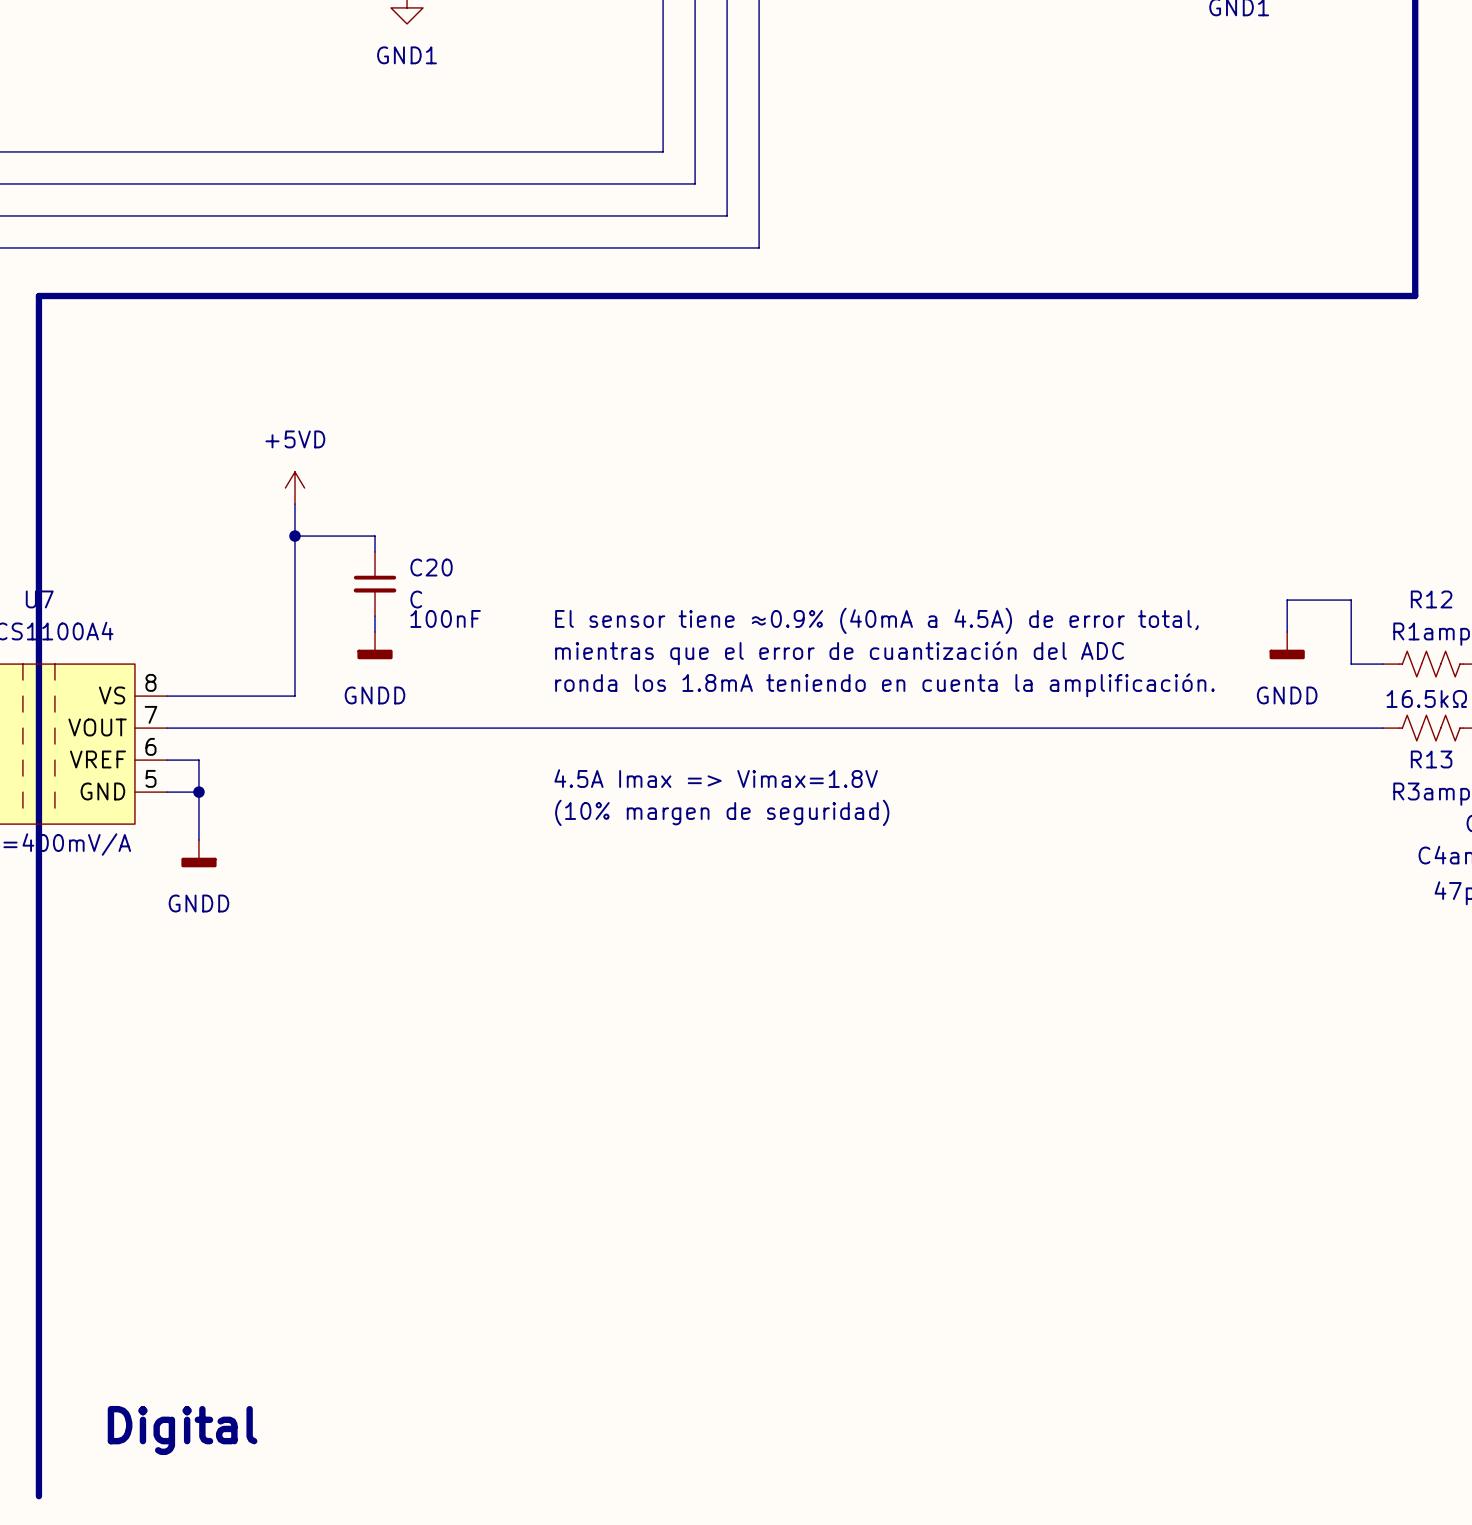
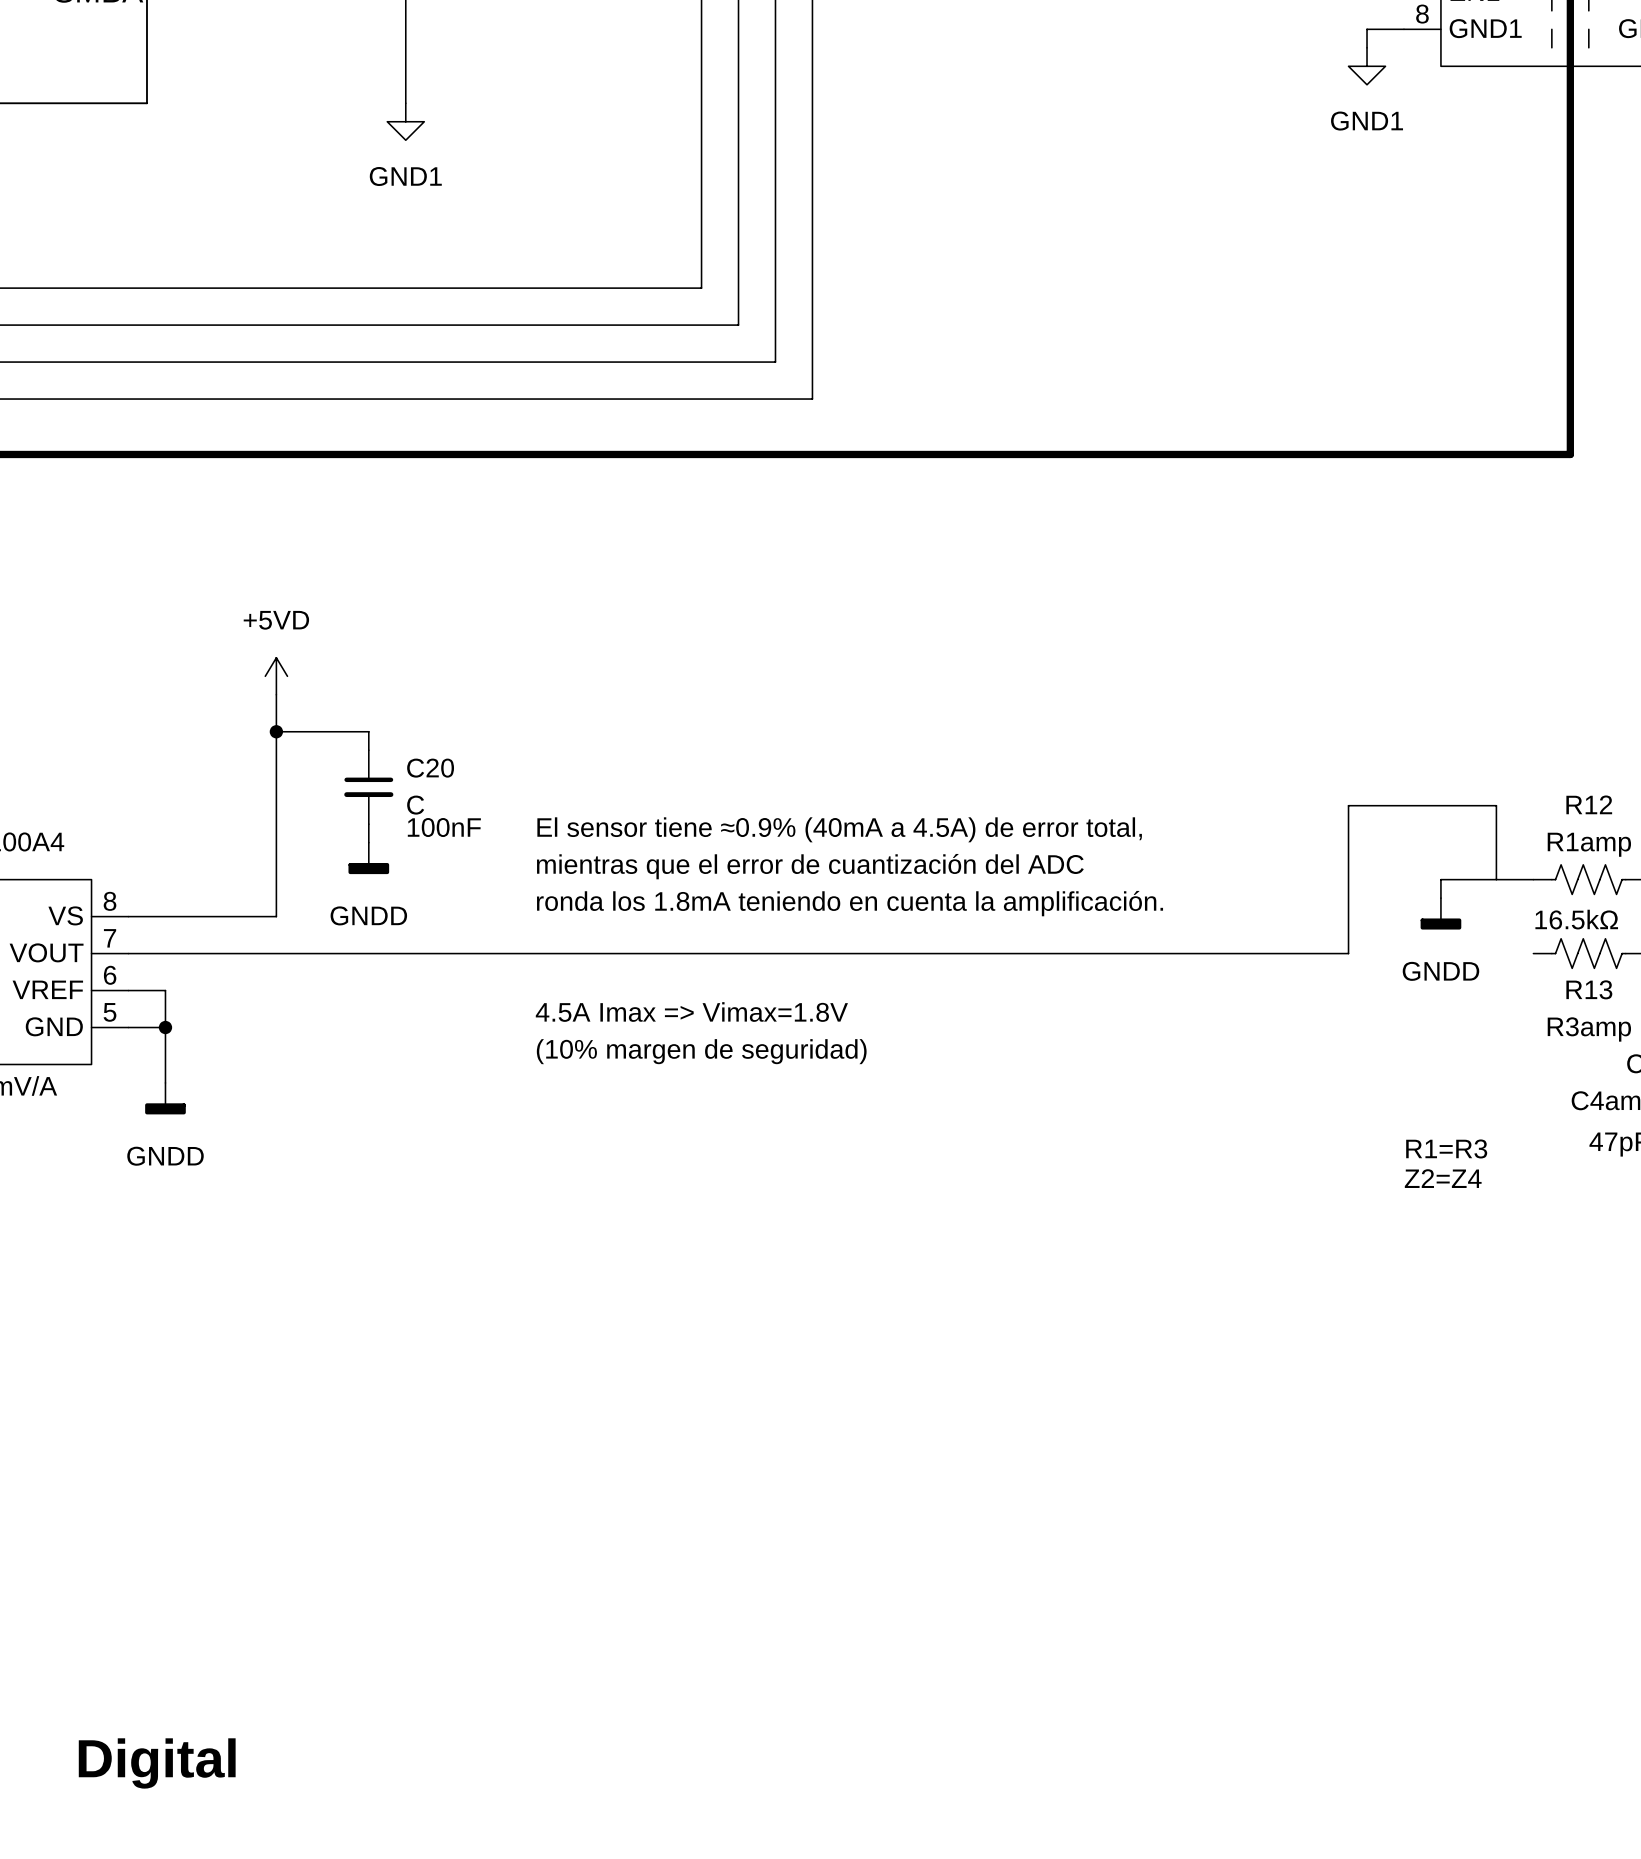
wire: (1287, 600) (1287, 632) -> (1422, 805) (1348, 805) (1348, 953)
text position: El sensor tiene ≈0.9% (40mA a 4.5A) de error total, (876, 620) -> El sensor tiene ≈0.9% (40mA a 4.5A) de error total, (839, 829)
power symbol position: GNDD (1287, 645) -> GNDD (1440, 913)
text position: mientras que el error de cuantización del ADC (839, 653) -> mientras que el error de cuantización del ADC (810, 866)
wire: none -> (1496, 879) (1440, 879) (1440, 898)
text position: ronda los 1.8mA teniendo en cuenta la amplificación. (884, 685) -> ronda los 1.8mA teniendo en cuenta la amplificación. (850, 903)
wire: (1223, 728) (1383, 728) -> none
text position: 4.5A Imax => Vimax=1.8V (716, 778) -> 4.5A Imax => Vimax=1.8V (691, 1012)
text position: (10% margen de seguridad) (722, 812) -> (10% margen de seguridad) (701, 1051)
text: none -> R1=R3 (1446, 1148)
text: none -> Z2=Z4 (1443, 1178)

